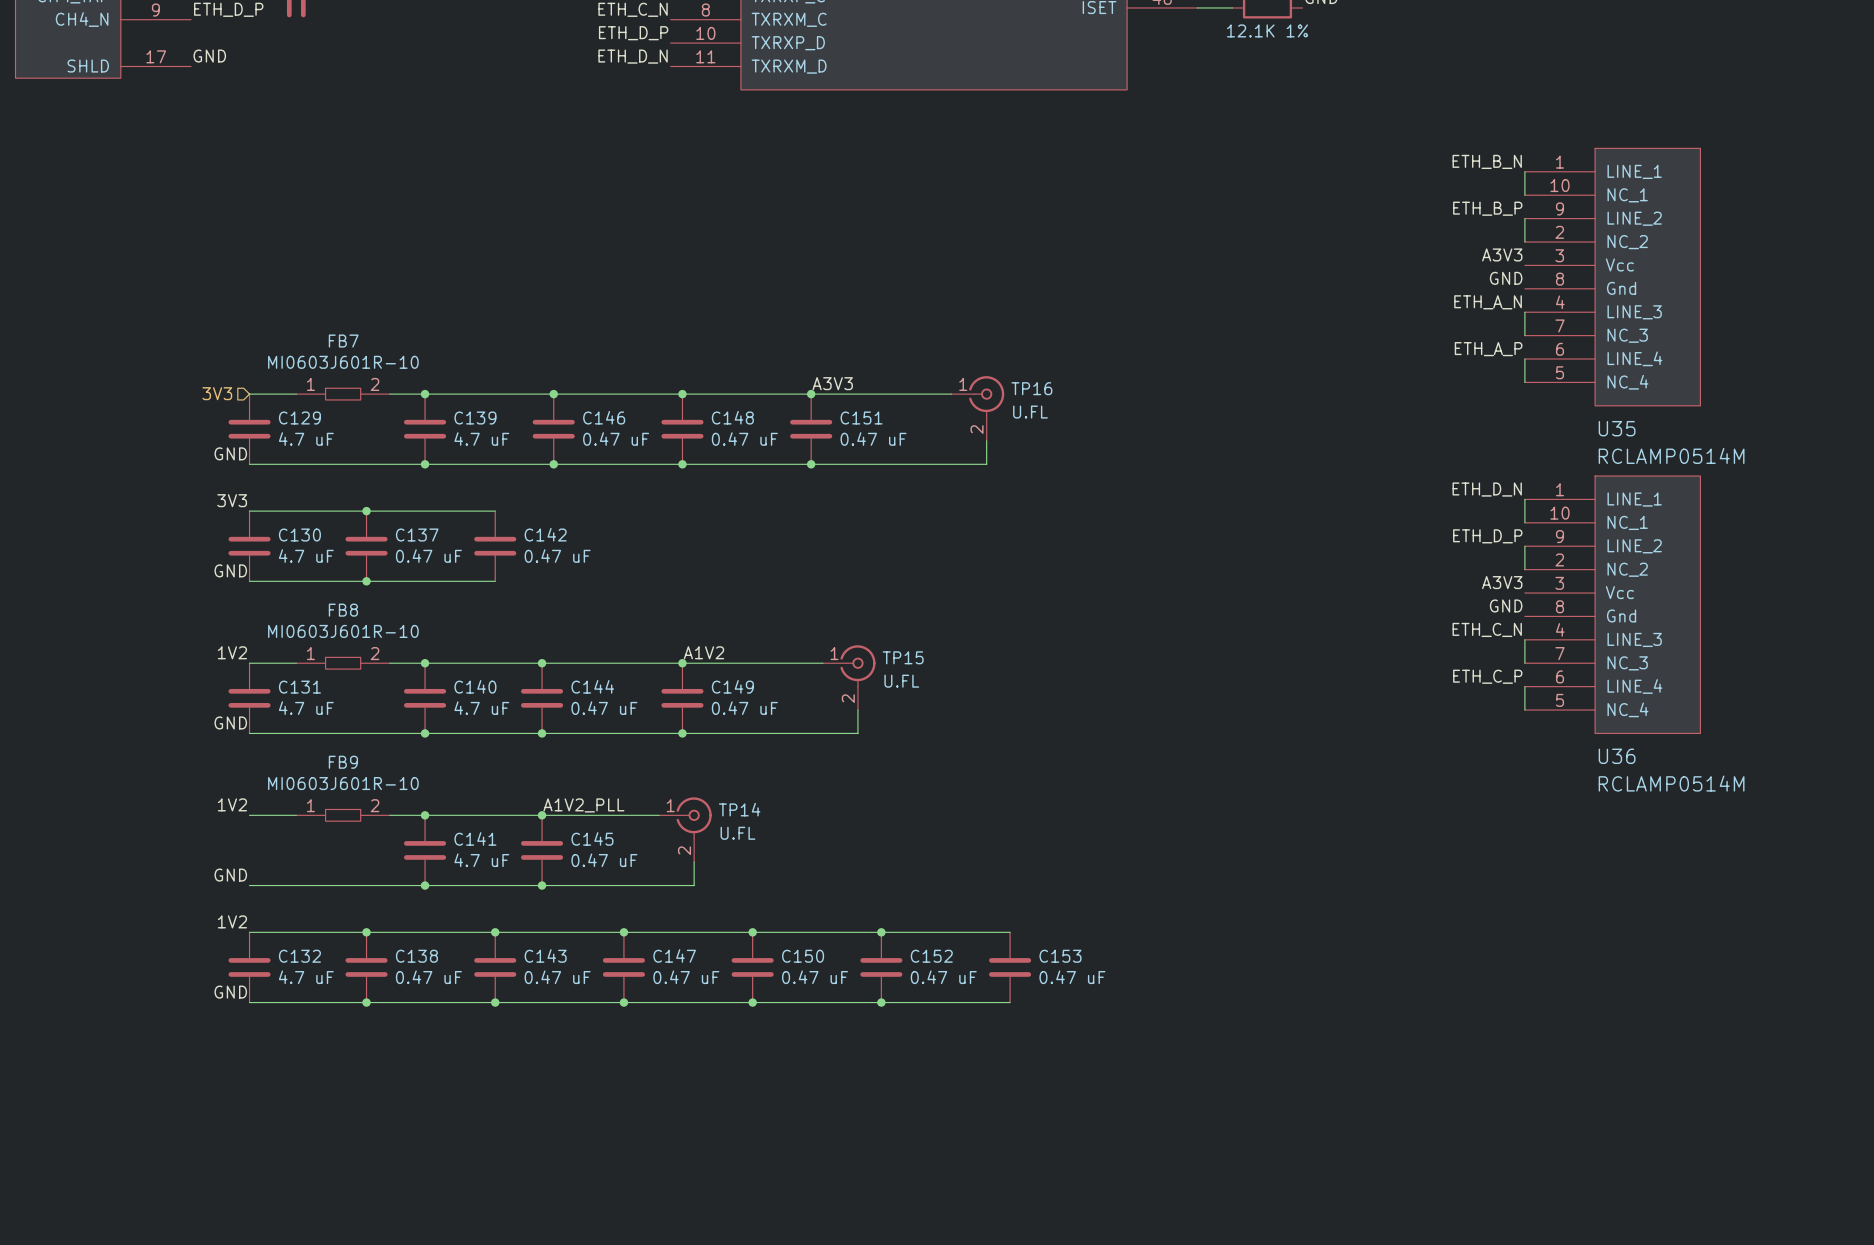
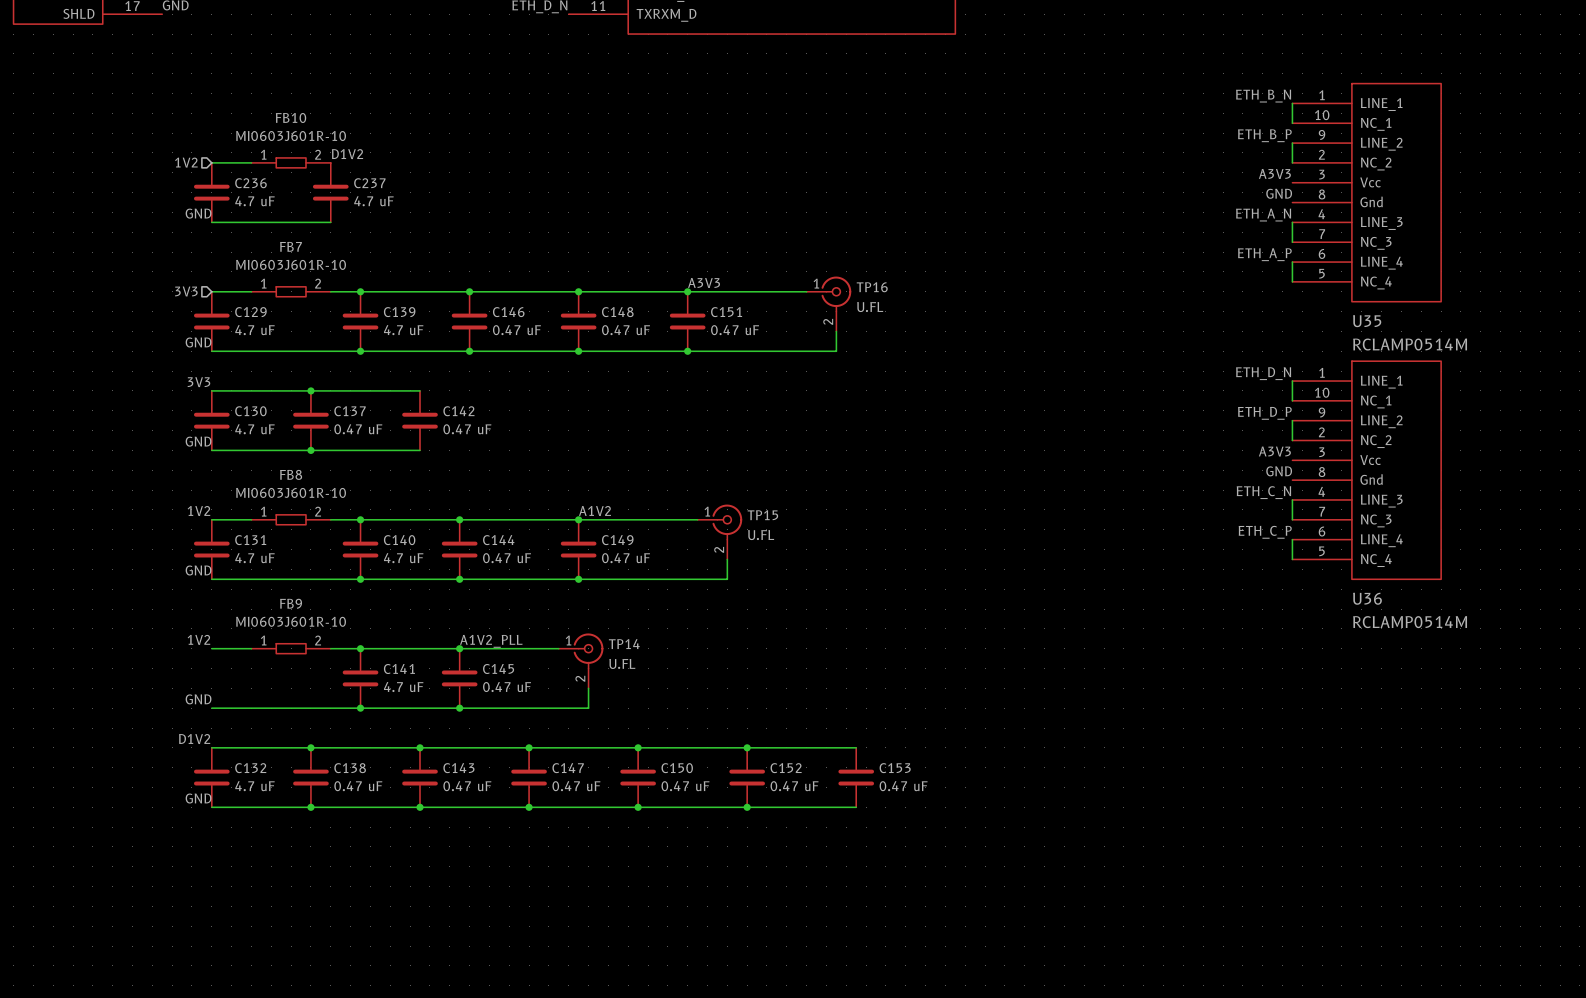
label: none -> D1V2 (347, 154)
hierarchical label: none -> 1V2 (186, 162)
wire: none -> (211, 162) (251, 162)
FB10: none -> MI0603J601R-10 (291, 162)
C236: none -> 4.7 uF (211, 192)
C237: none -> 4.7 uF (330, 192)
label: none -> GND (198, 213)
wire: none -> (211, 222) (330, 222)
label: 1V2 (232, 921) -> D1V2 (194, 739)

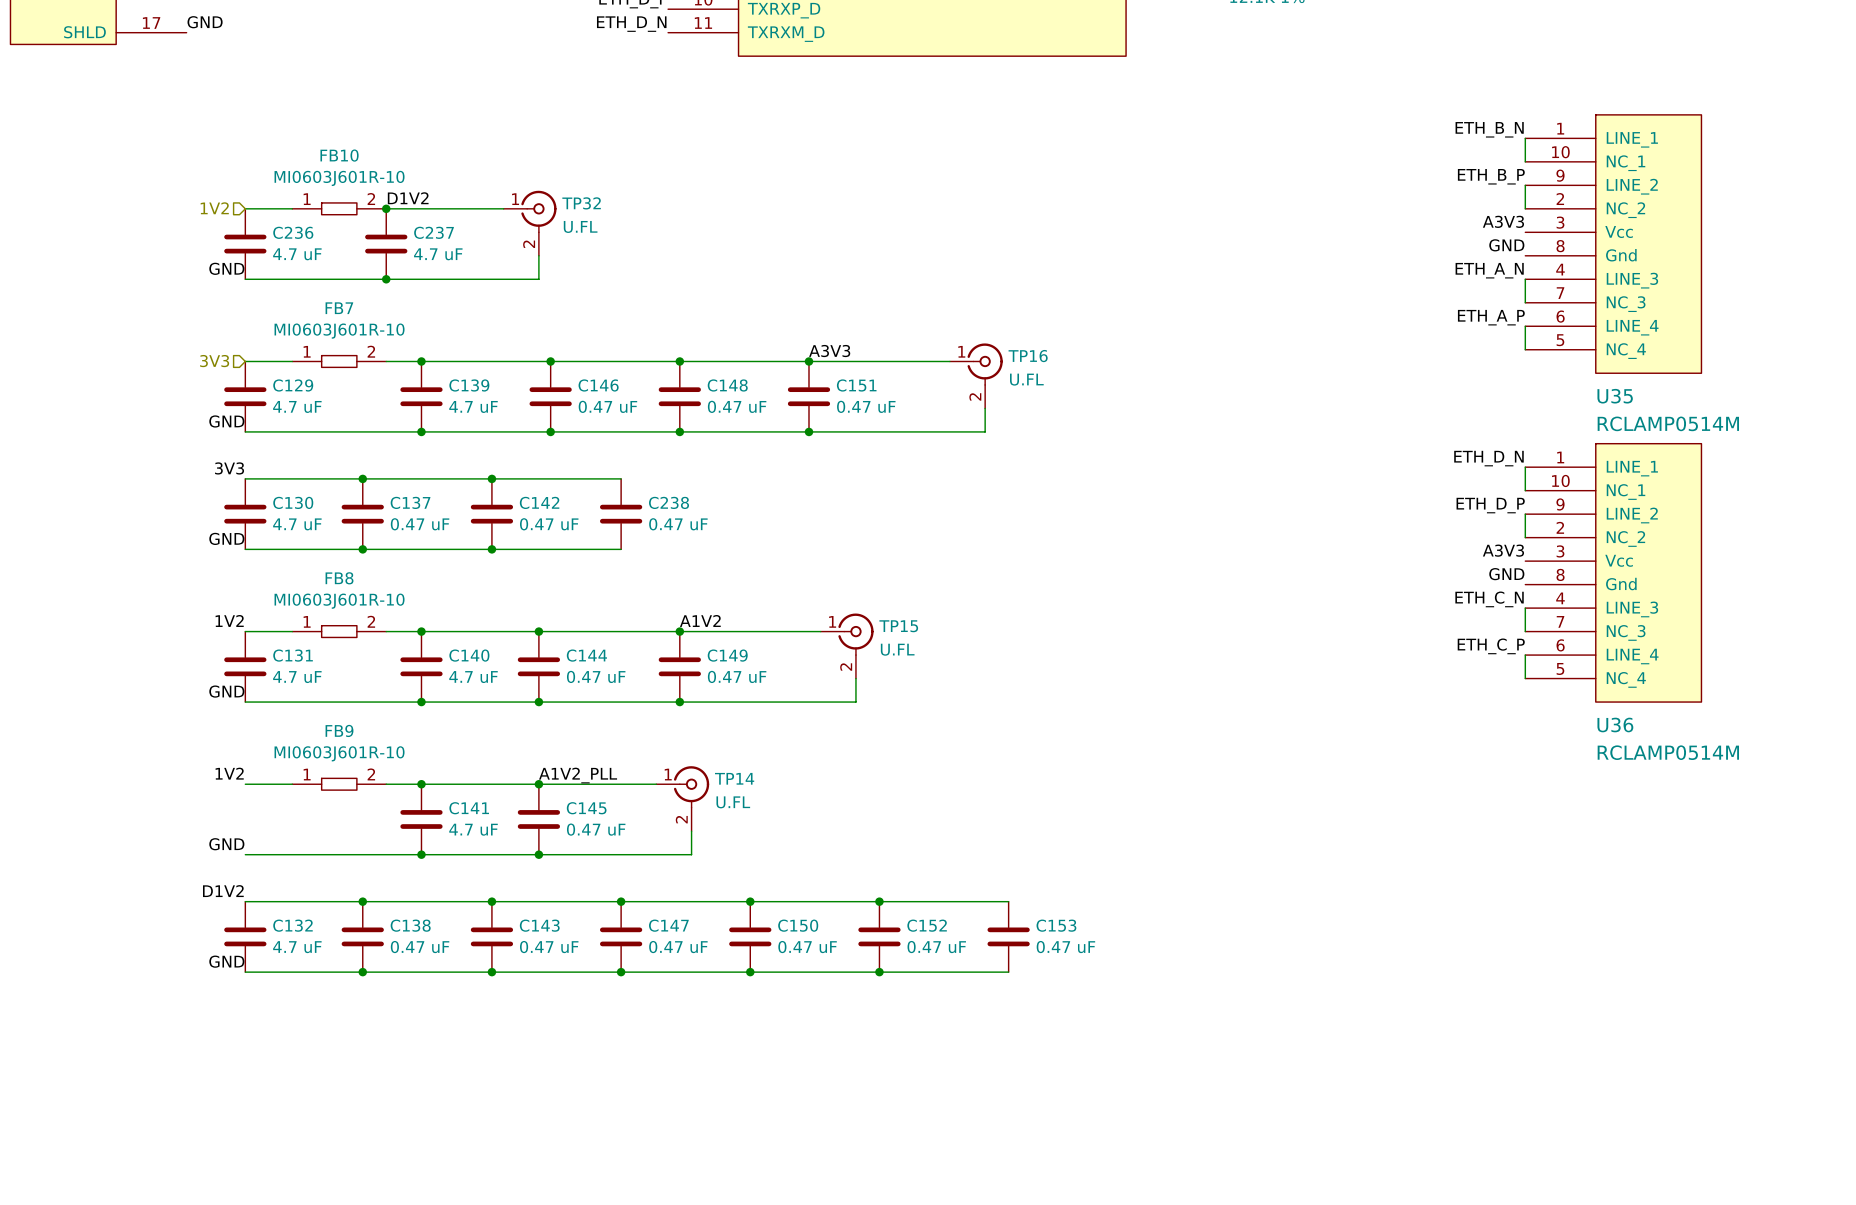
wire: none -> (386, 208) (503, 208)
junction: none -> (386, 208)
TP32: none -> U.FL (530, 223)
wire: none -> (538, 255) (538, 279) (386, 279)
junction: none -> (386, 279)
wire: none -> (491, 478) (621, 478)
junction: none -> (491, 478)
C238: none -> 0.47 uF (621, 514)
wire: none -> (491, 549) (621, 549)
junction: none -> (491, 549)

